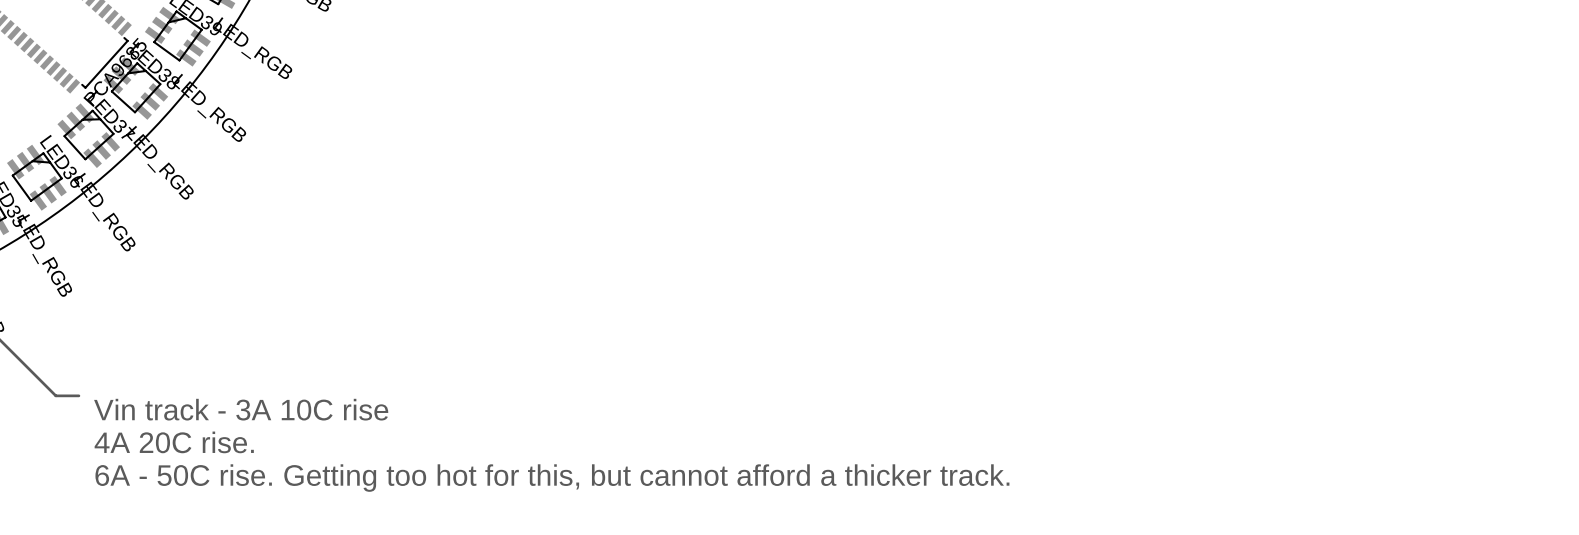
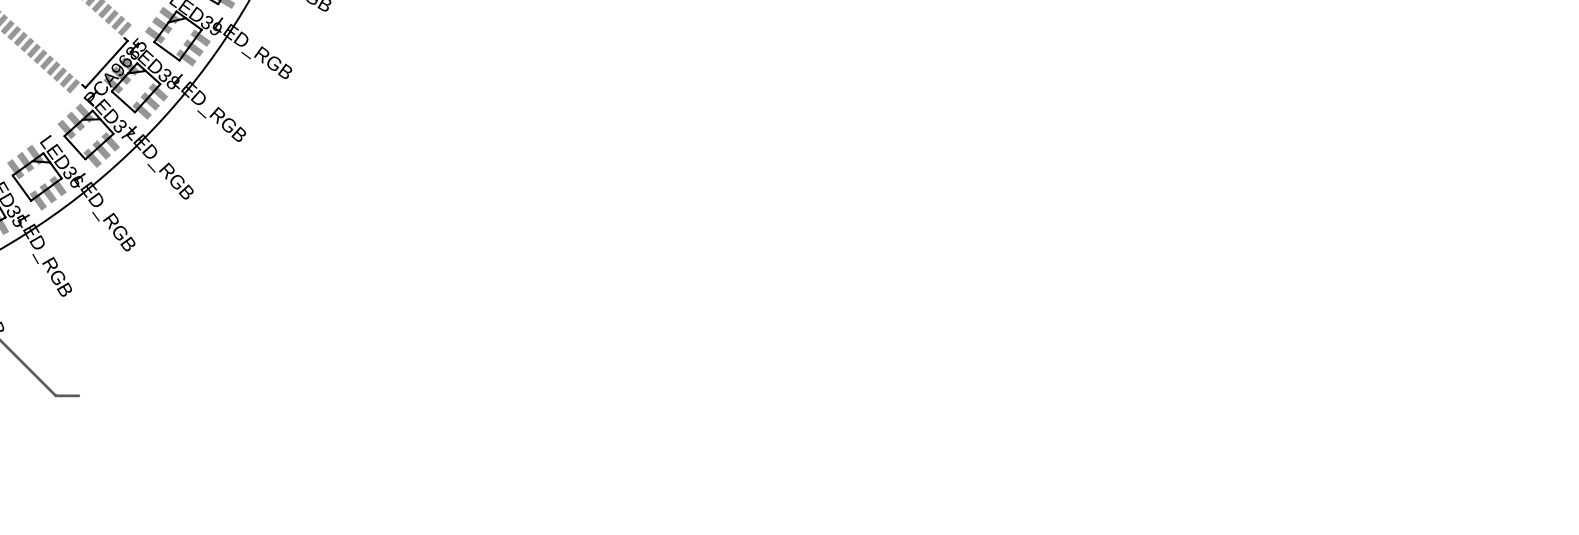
text: Vin track - 3A 10C rise (241, 409) -> none
text: 4A 20C rise. (174, 442) -> none
text: 6A - 50C rise. Getting too hot for this, but cannot afford a thicker track. (552, 478) -> none

